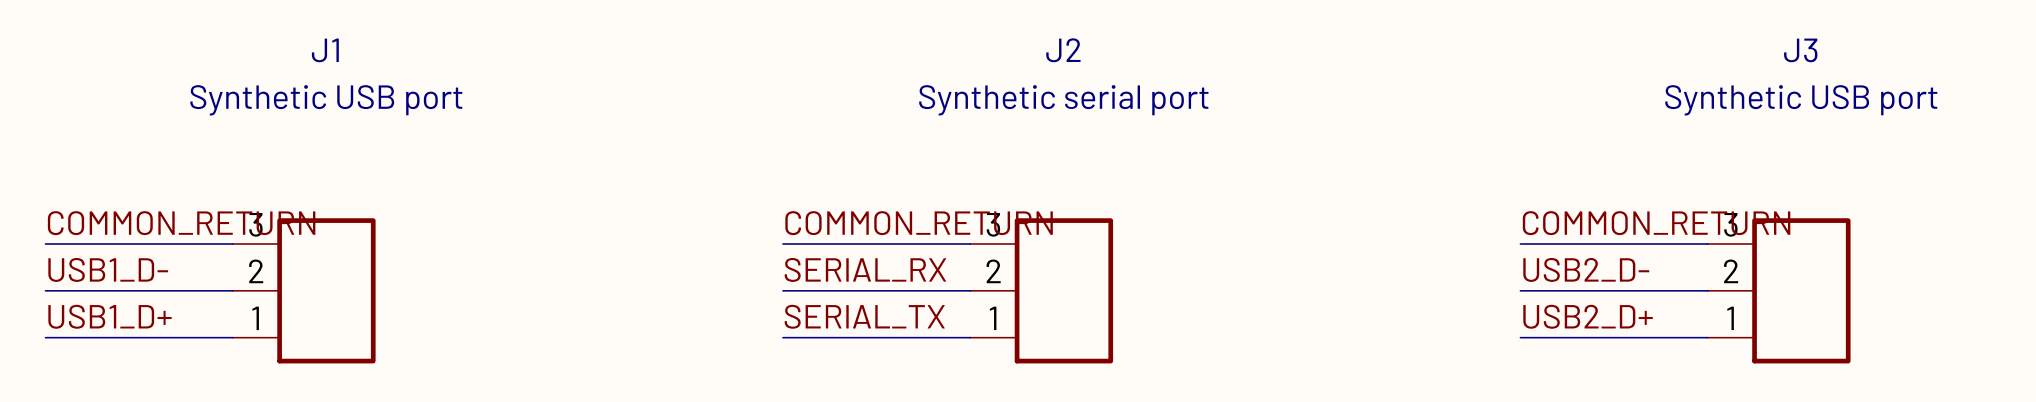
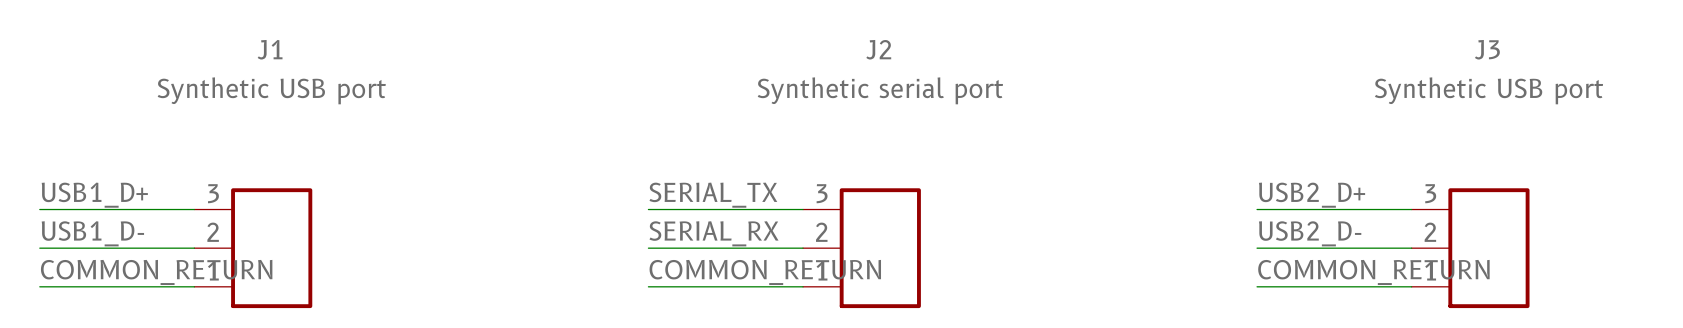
label: COMMON_RETURN (181, 223) -> USB1_D+ (94, 195)
label: COMMON_RETURN (919, 223) -> SERIAL_TX (713, 195)
label: COMMON_RETURN (1656, 223) -> USB2_D+ (1312, 195)
label: USB1_D+ (109, 316) -> COMMON_RETURN (156, 272)
label: SERIAL_TX (864, 316) -> COMMON_RETURN (765, 272)
label: USB2_D+ (1588, 316) -> COMMON_RETURN (1373, 272)

